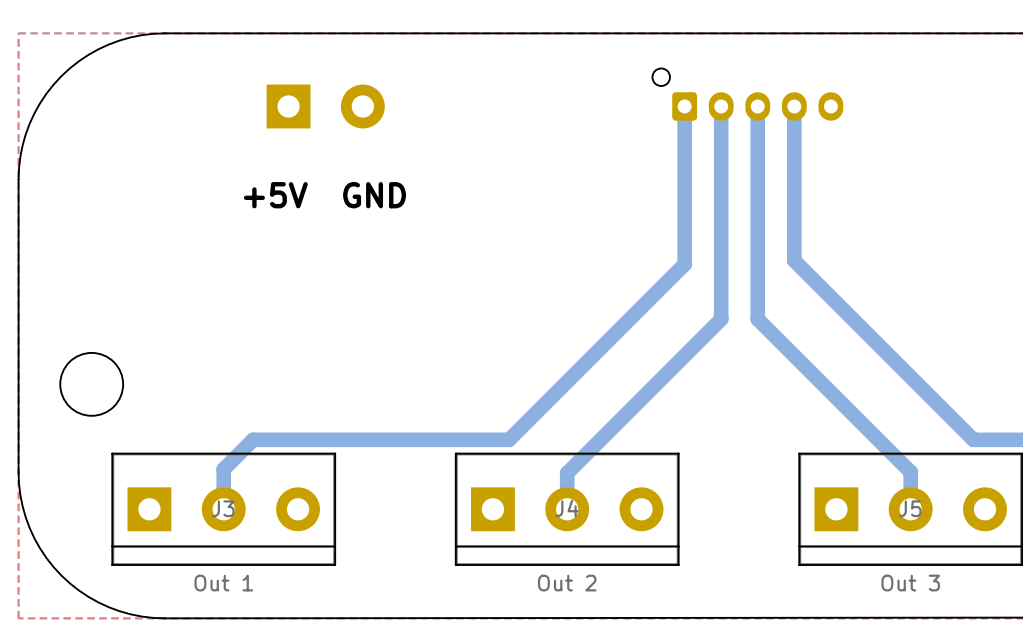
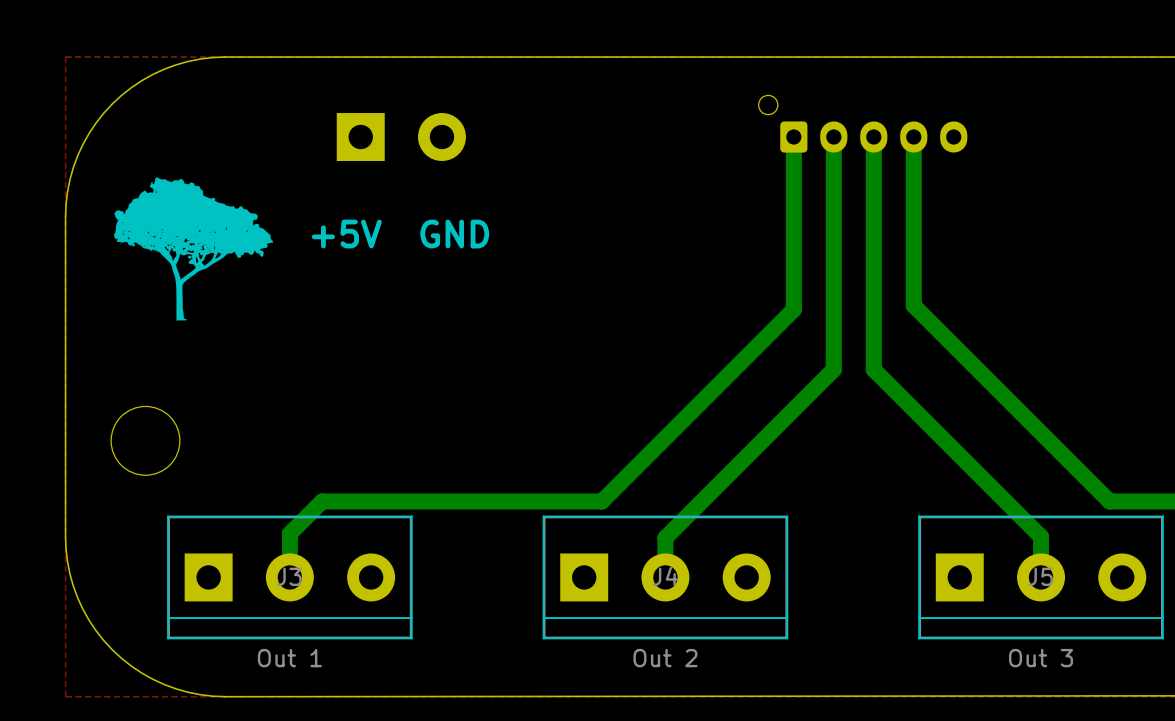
drawing: none -> [114, 177, 273, 321]

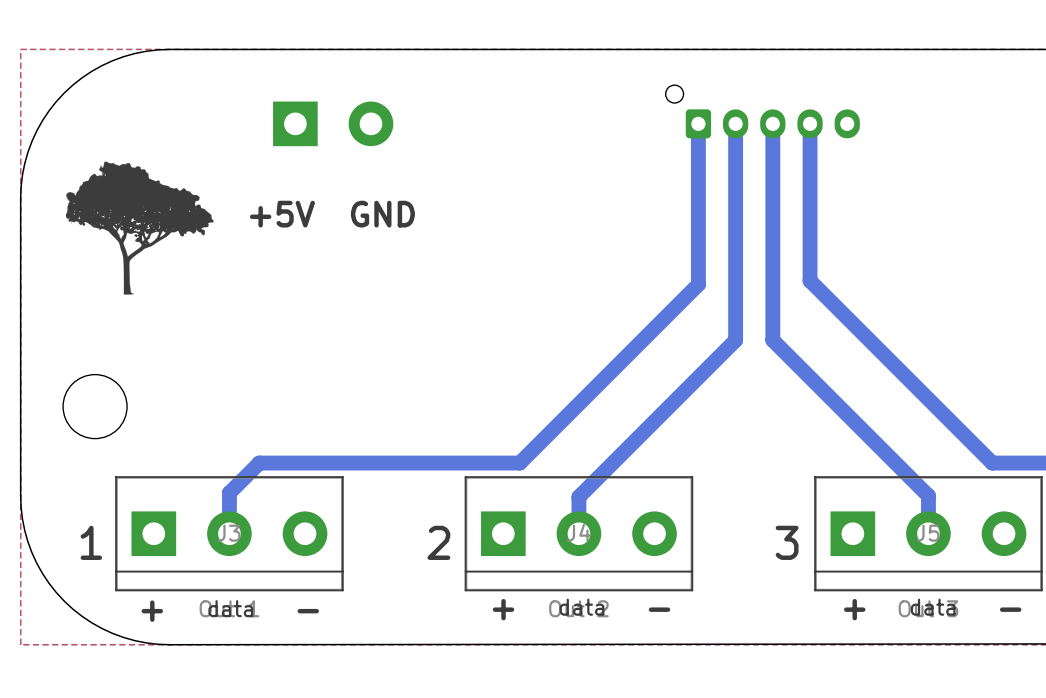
text: none -> 1 (91, 542)
text: none -> 2 (438, 542)
text: none -> 3 (787, 542)
text: none -> data (581, 607)
text: none -> data (933, 607)
text: none -> data (230, 608)
text: none -> + (503, 609)
text: none -> - (659, 609)
text: none -> + (854, 609)
text: none -> - (1010, 609)
text: none -> + (152, 611)
text: none -> - (308, 611)

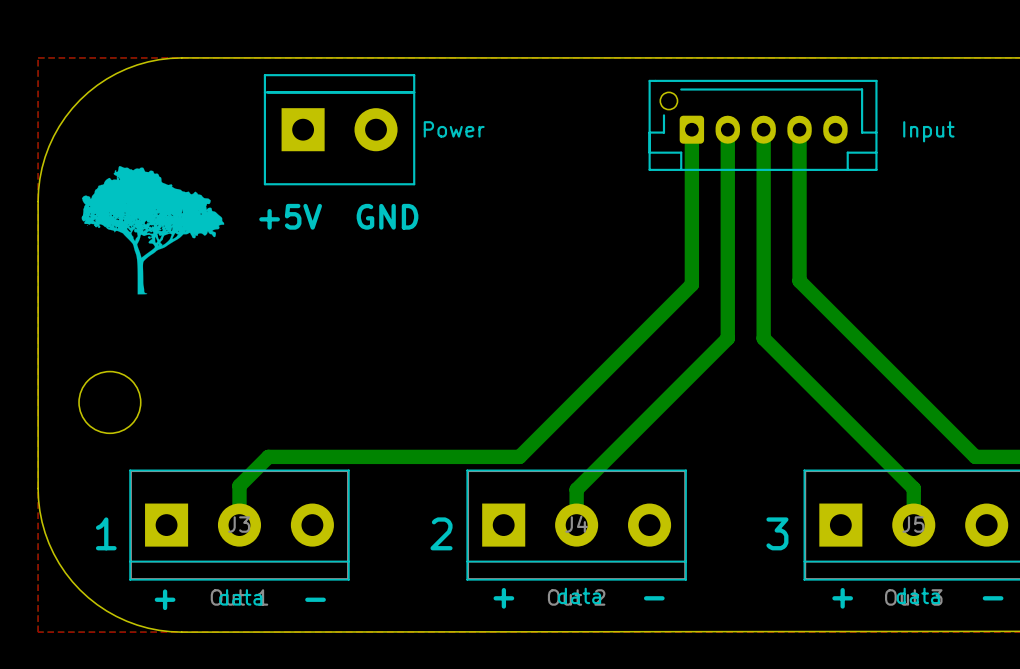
line: none -> (264, 75) (264, 184) (414, 184) (414, 75) (264, 75)
line: none -> (649, 80) (649, 169) (876, 169) (876, 80) (649, 80)
line: none -> (681, 89) (862, 89) (862, 132) (876, 132)
line: none -> (264, 92) (414, 92)
line: none -> (663, 115) (663, 132) (649, 132)
text: none -> Power (454, 129)
text: none -> Input (928, 131)
line: none -> (649, 152) (681, 152) (681, 169)
line: none -> (876, 152) (847, 152) (847, 169)

